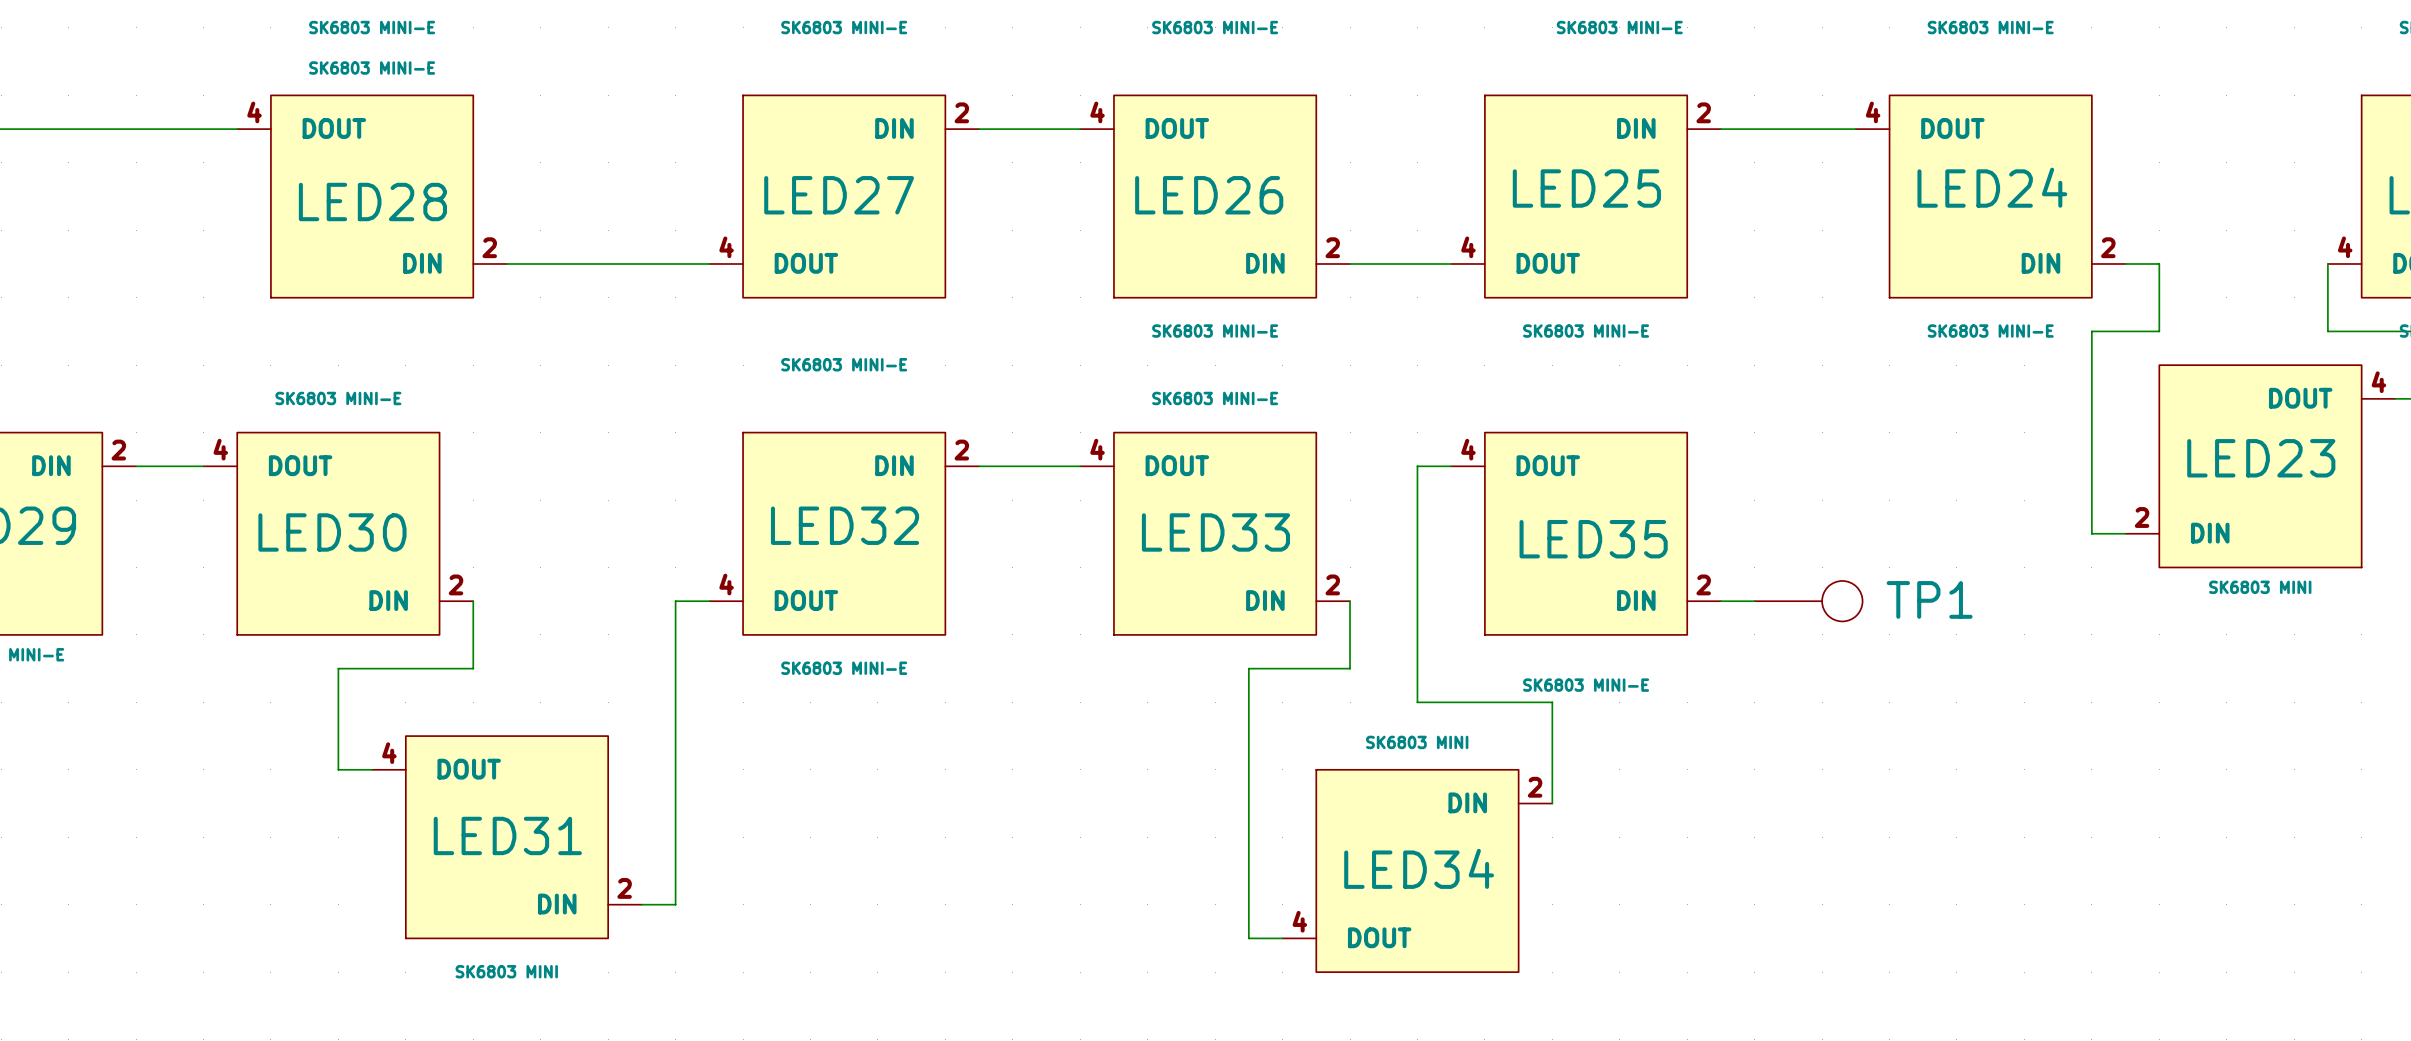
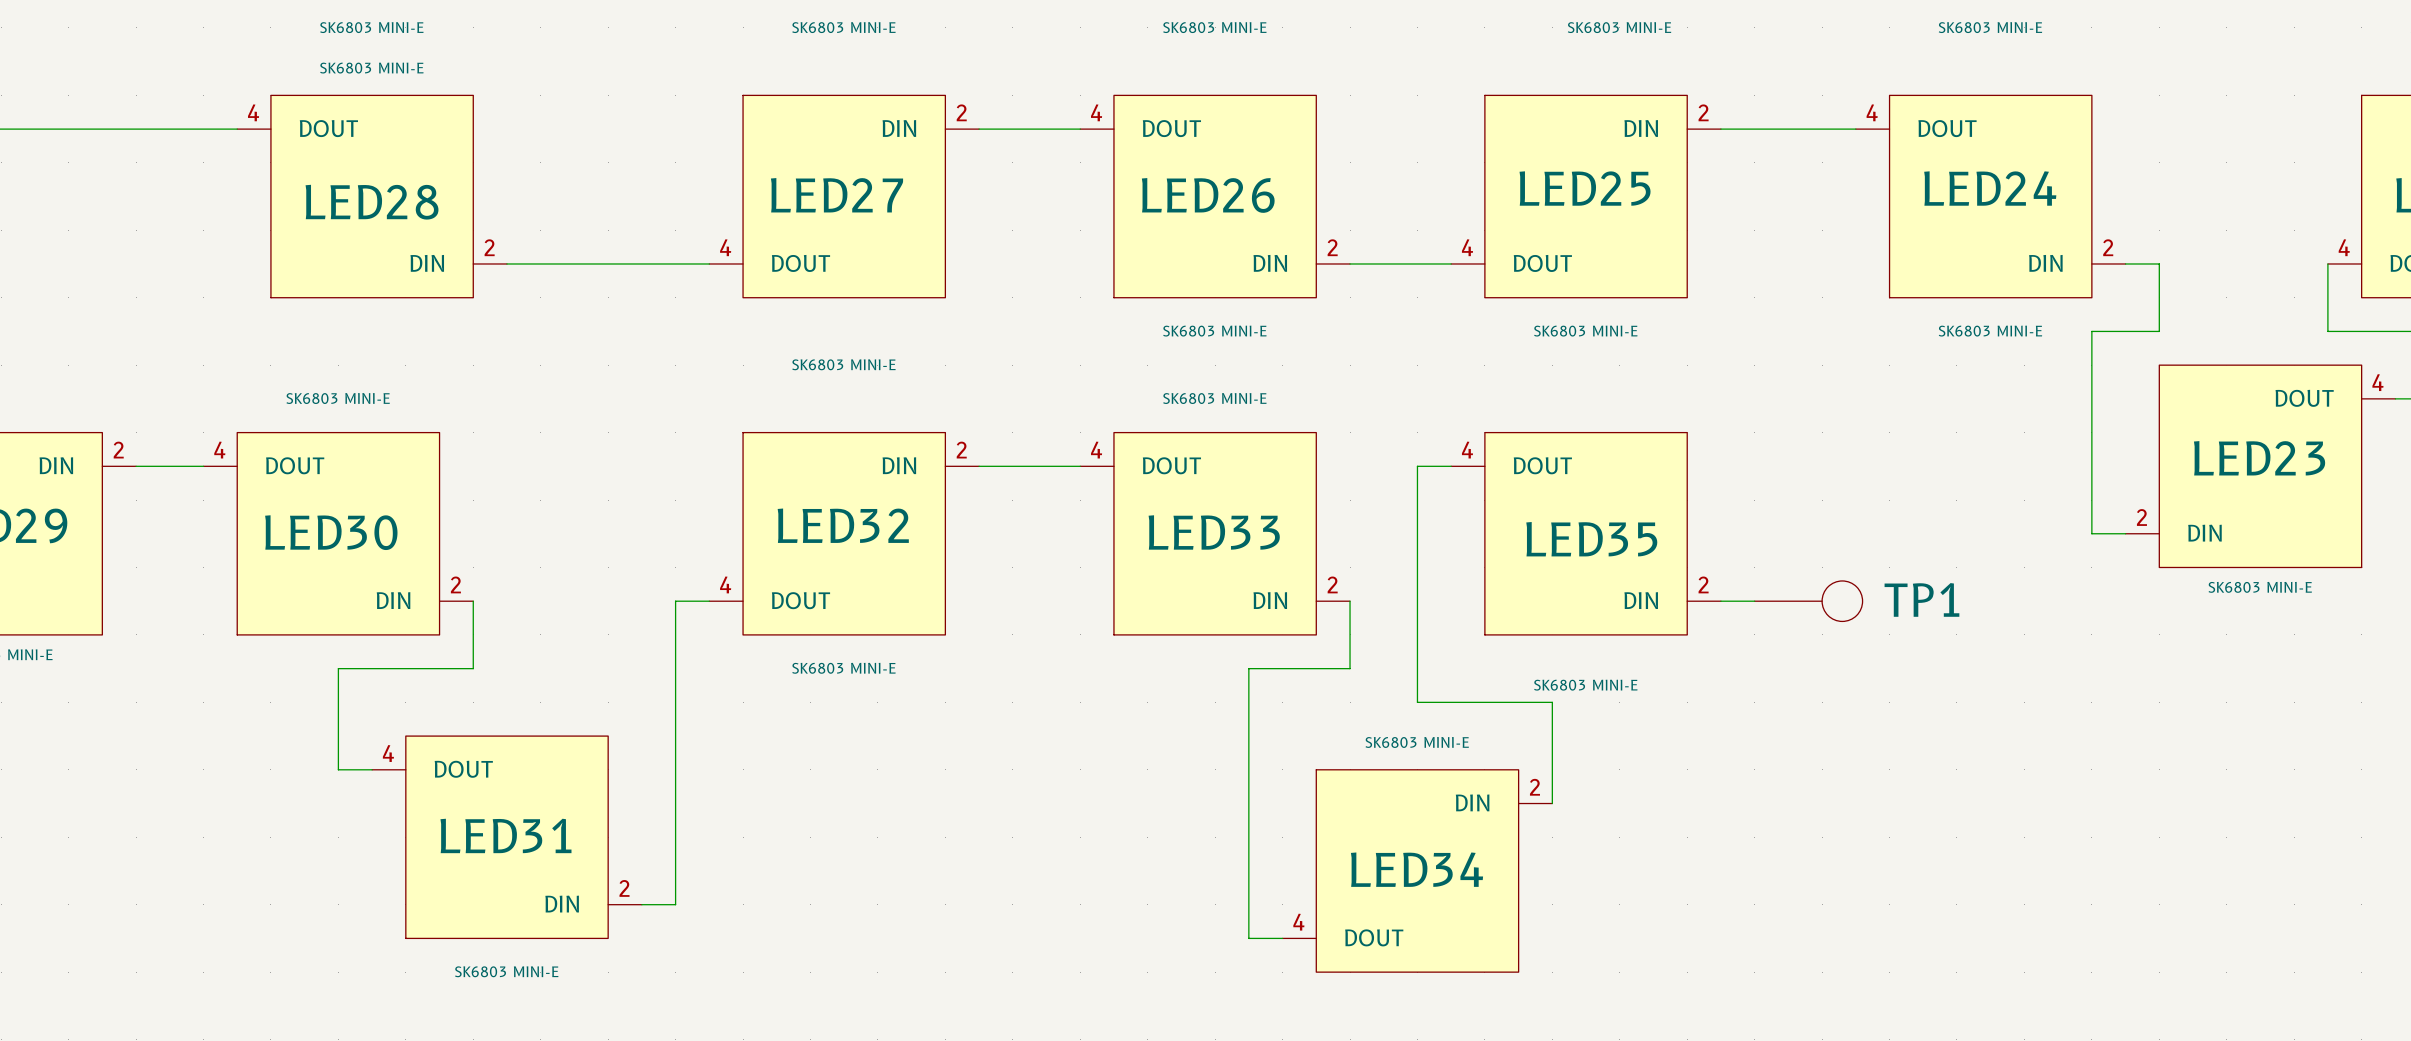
LED23 value: SK6803 MINI (2260, 587) -> SK6803 MINI-E (2260, 587)
LED34 value: SK6803 MINI (1417, 742) -> SK6803 MINI-E (1417, 742)
LED31 value: SK6803 MINI (506, 971) -> SK6803 MINI-E (506, 971)

